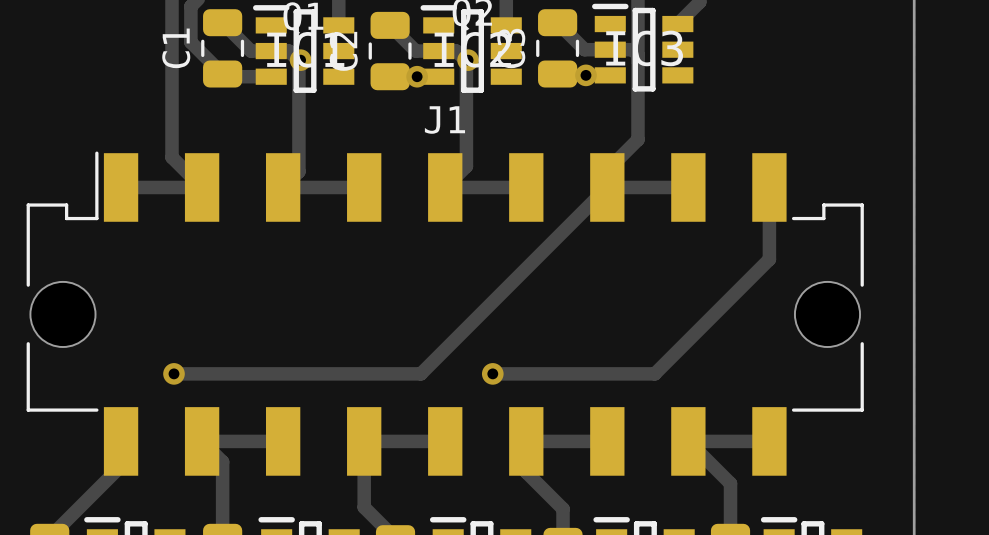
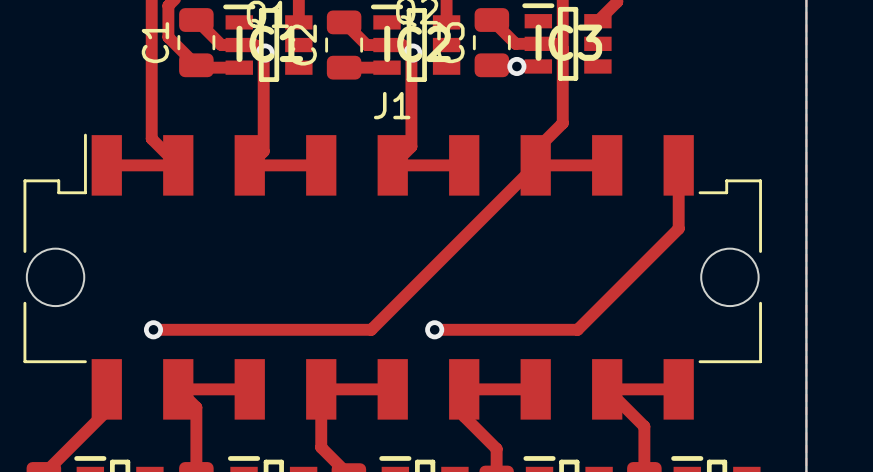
via: (417, 76) -> none

